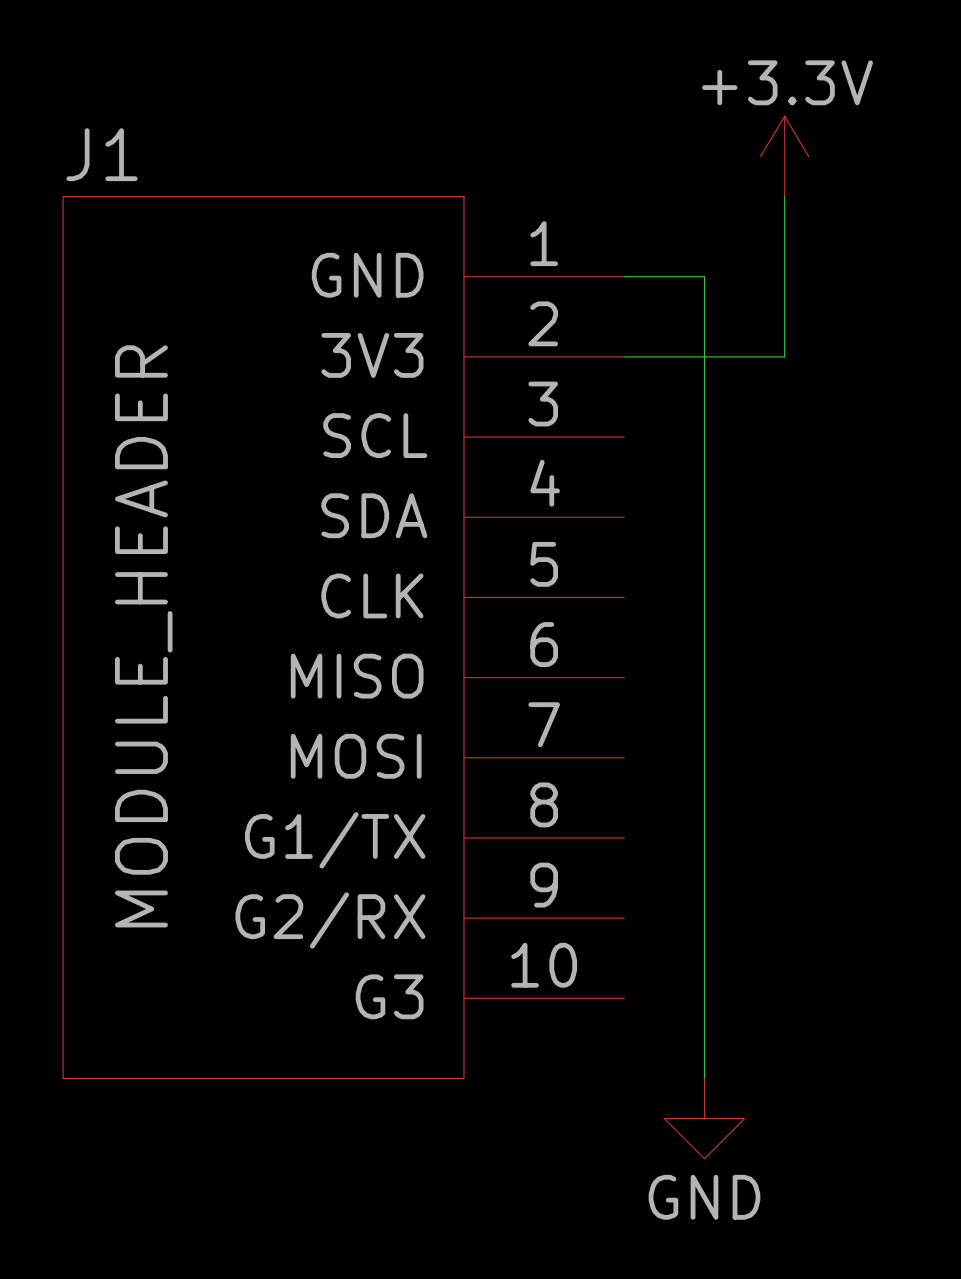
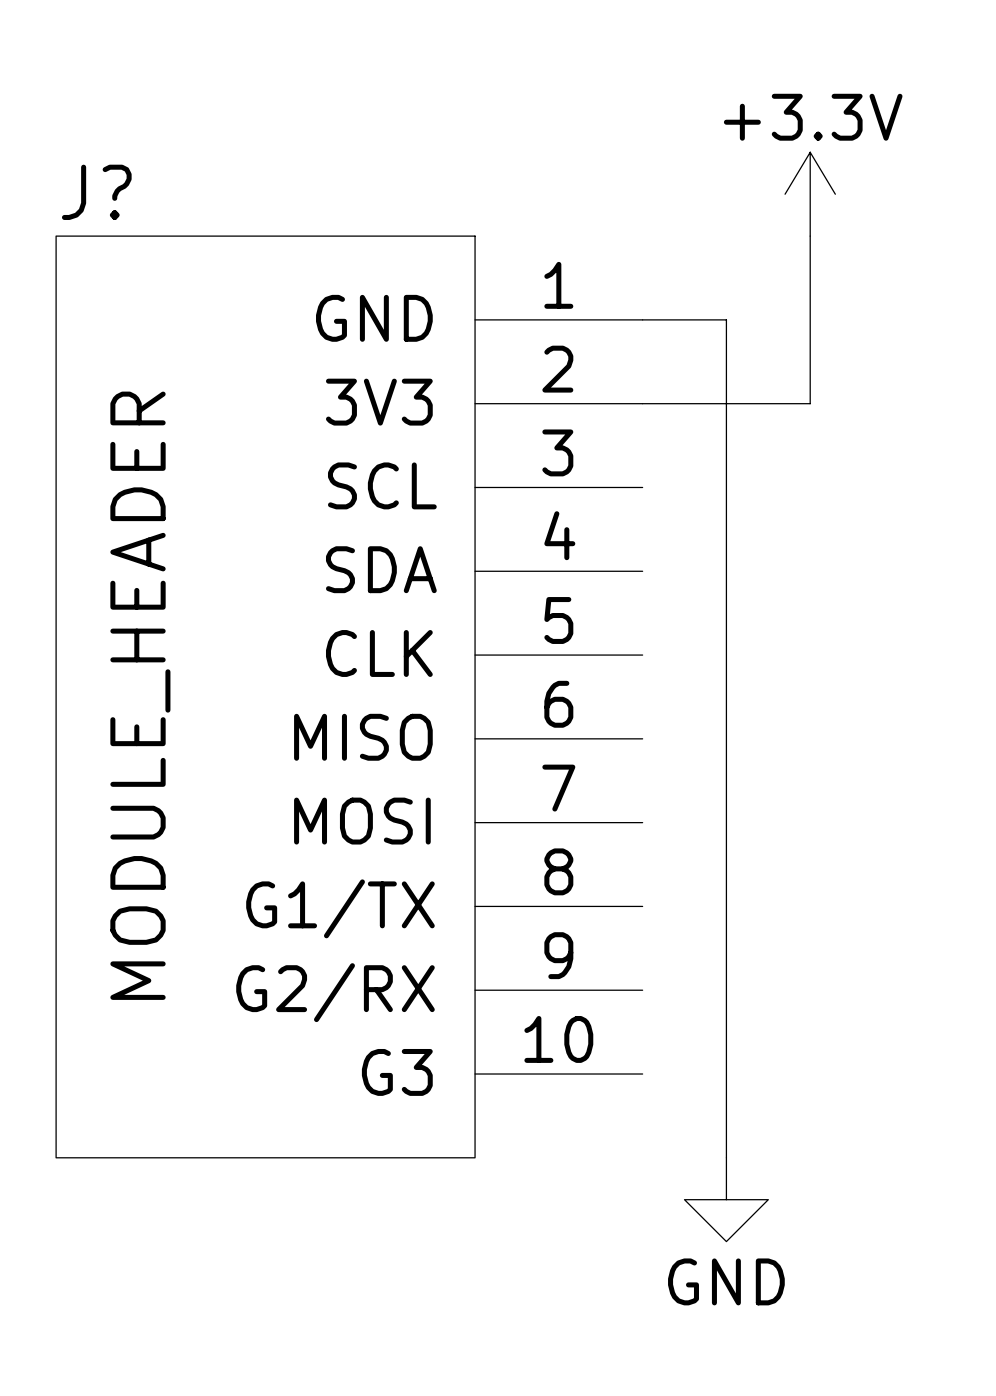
J1 name: J1 (102, 154) -> J? (96, 192)

